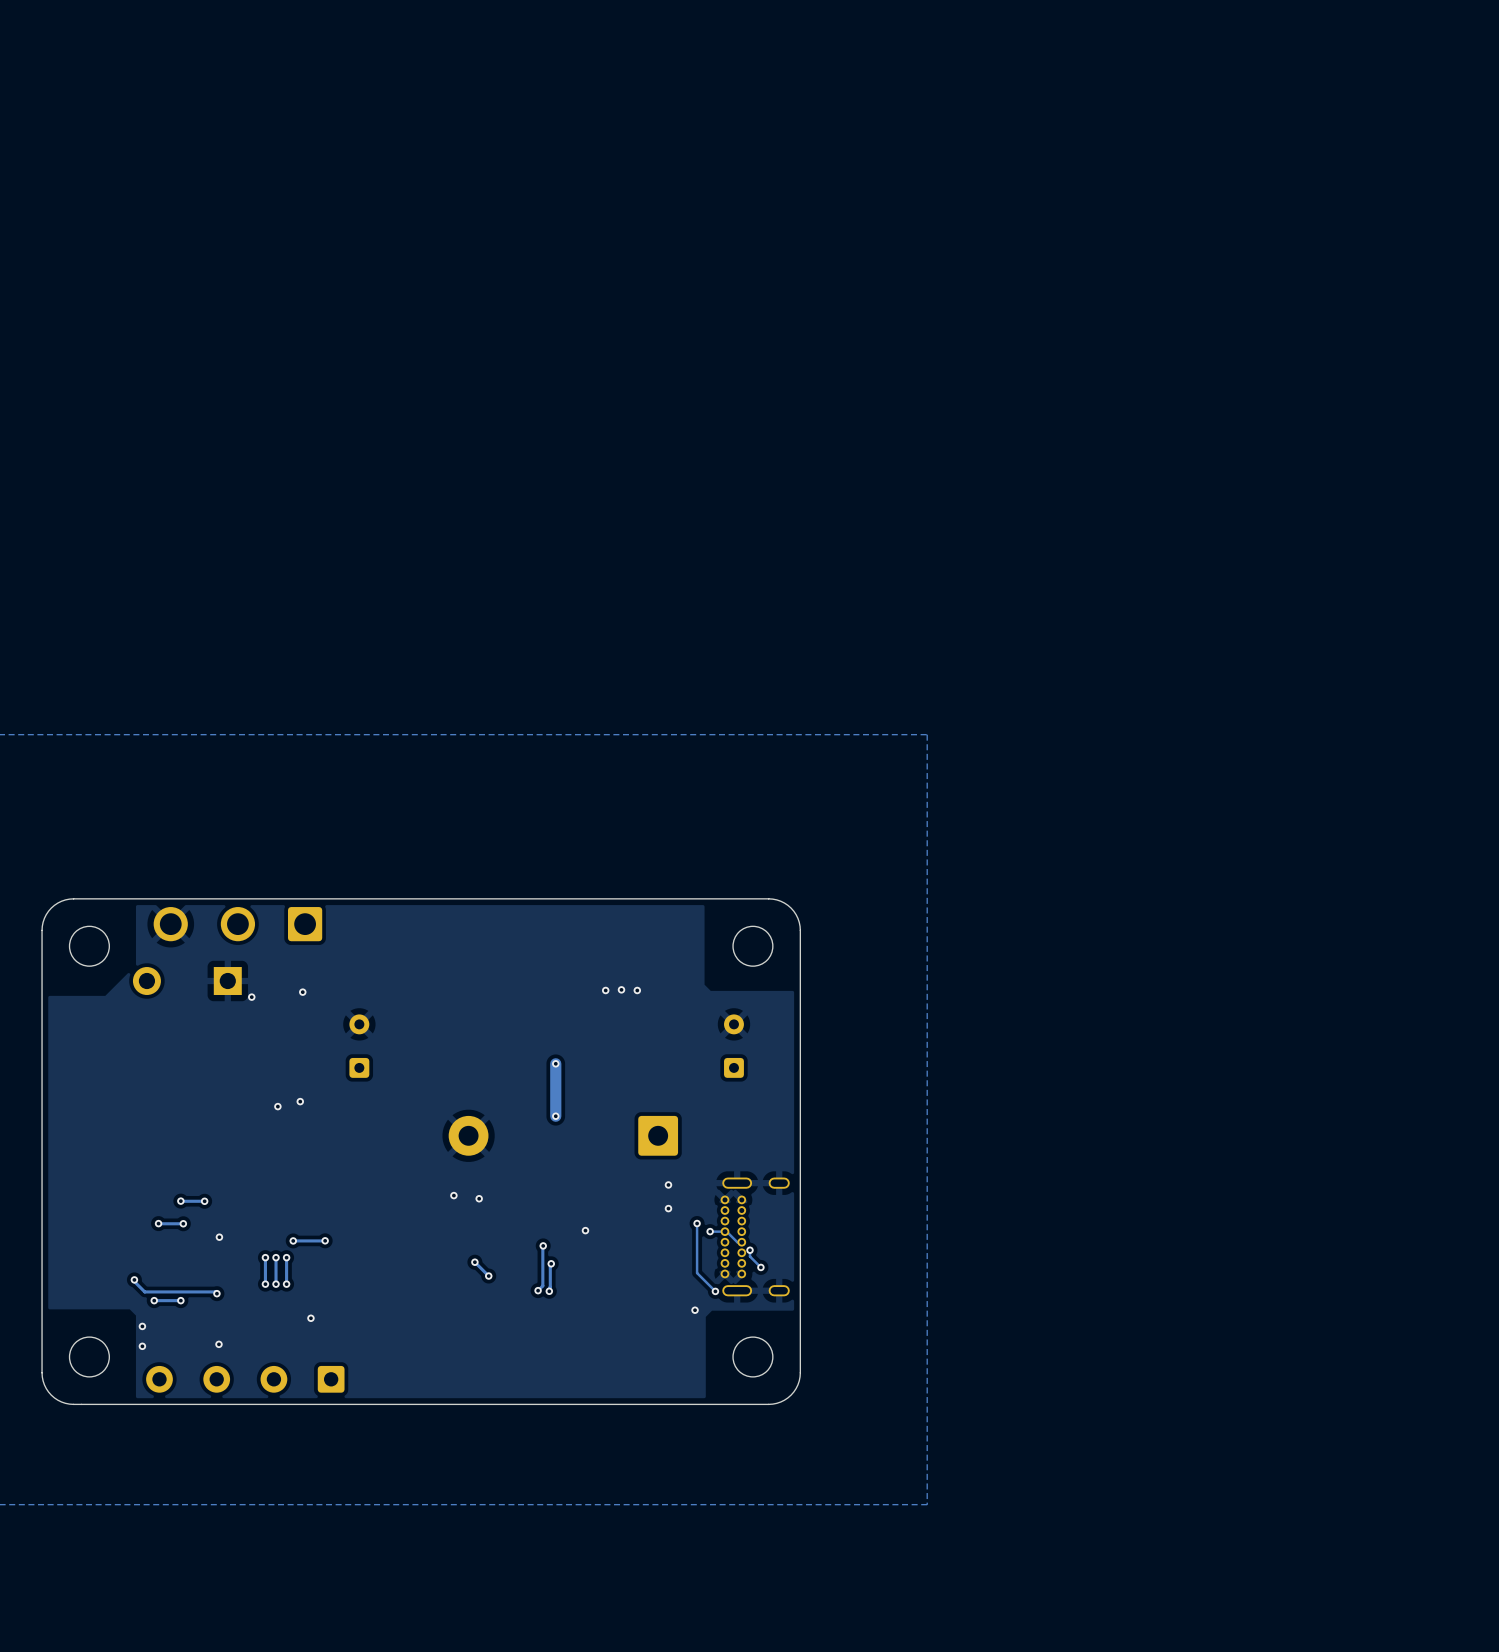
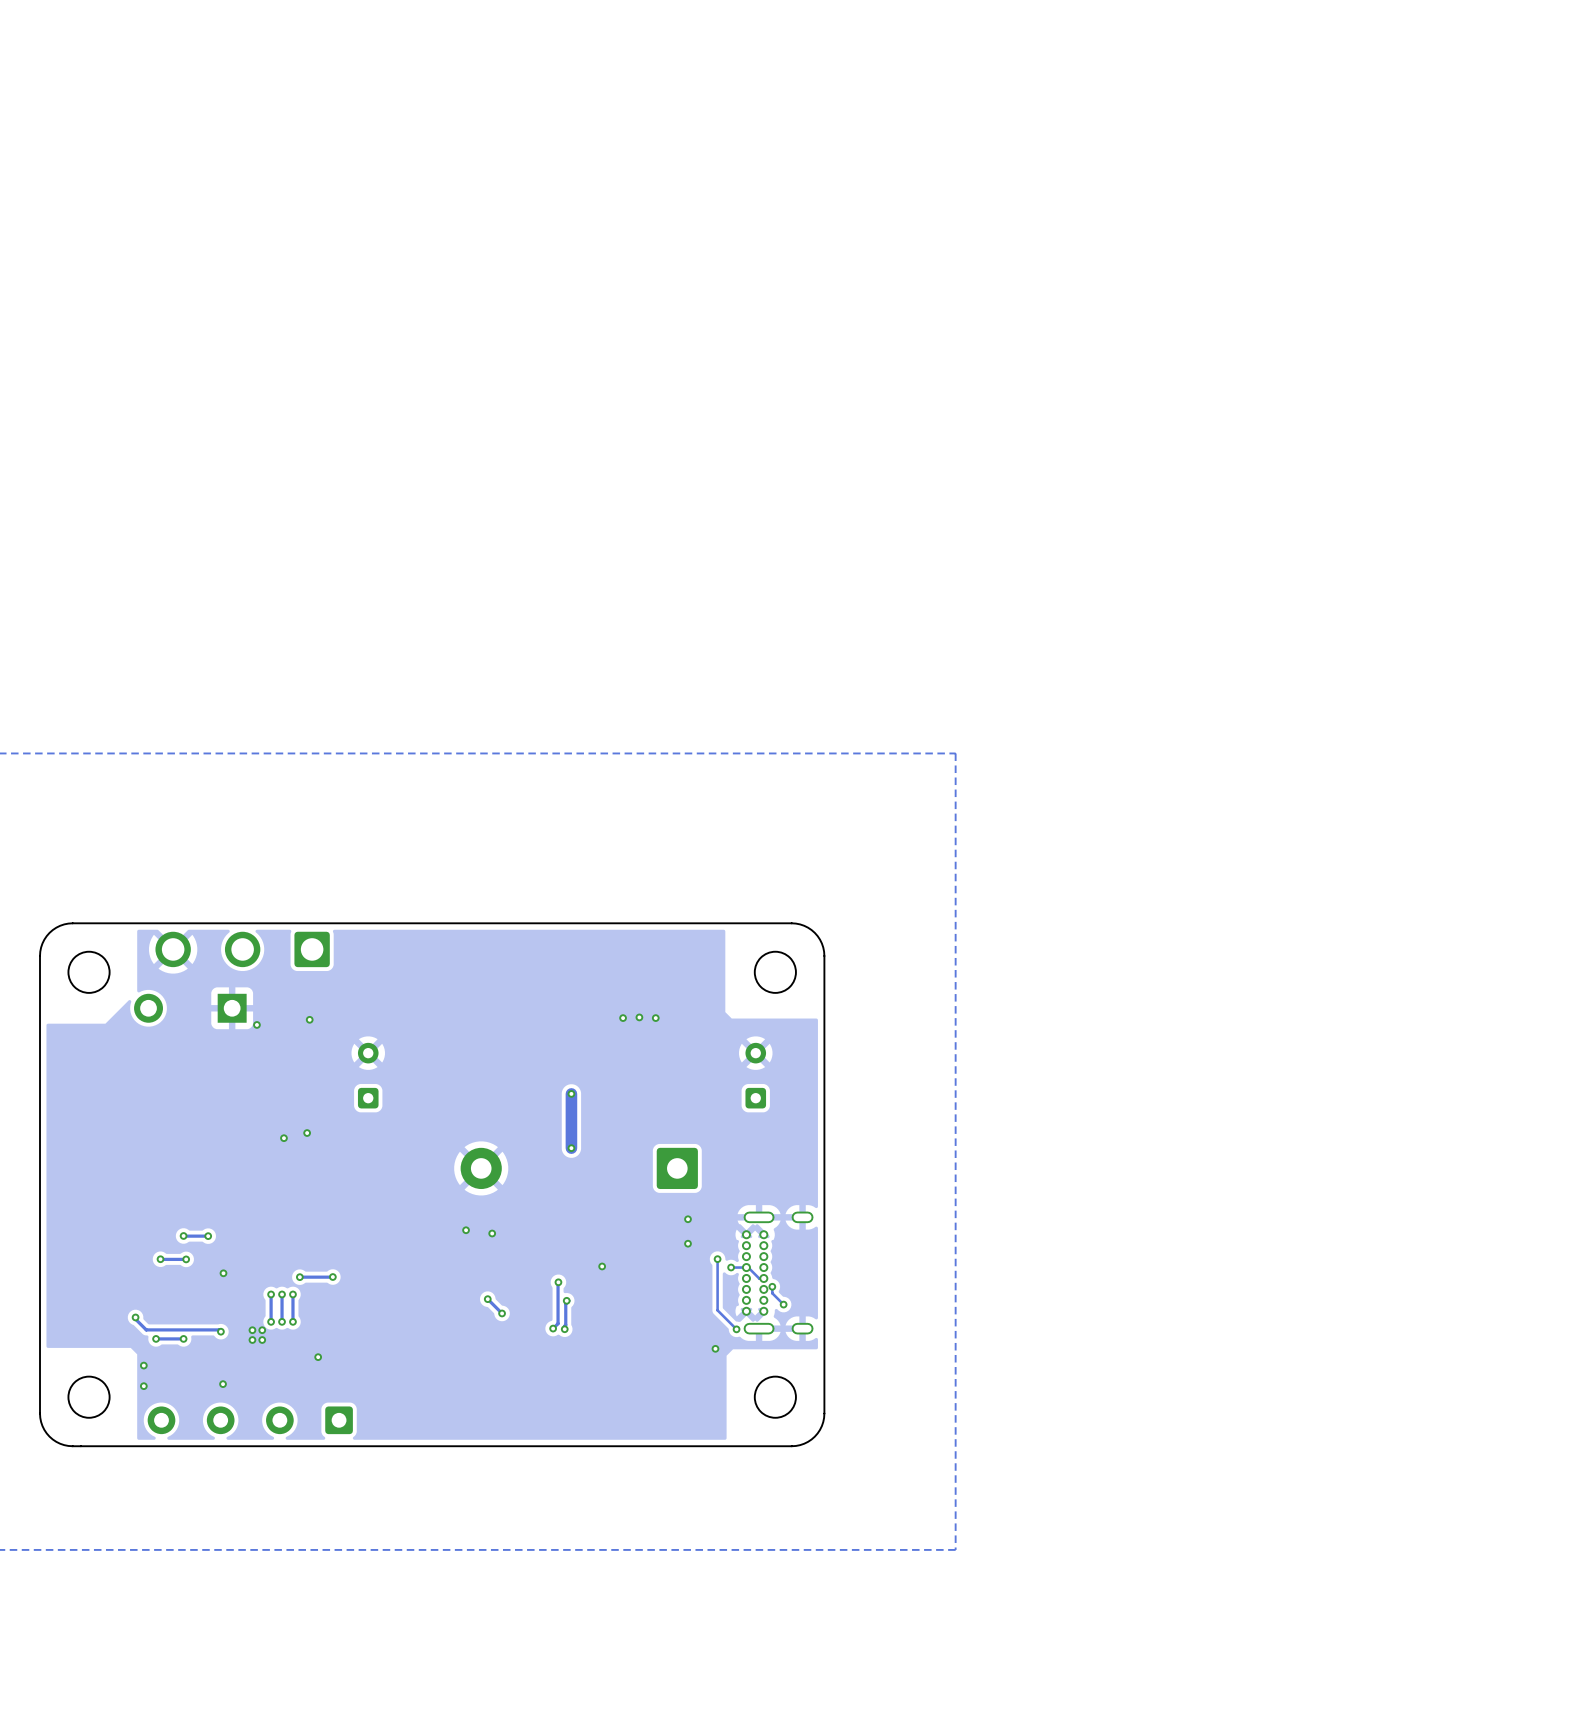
via: none -> (252, 1330)
via: none -> (262, 1330)
via: none -> (252, 1340)
via: none -> (262, 1340)

